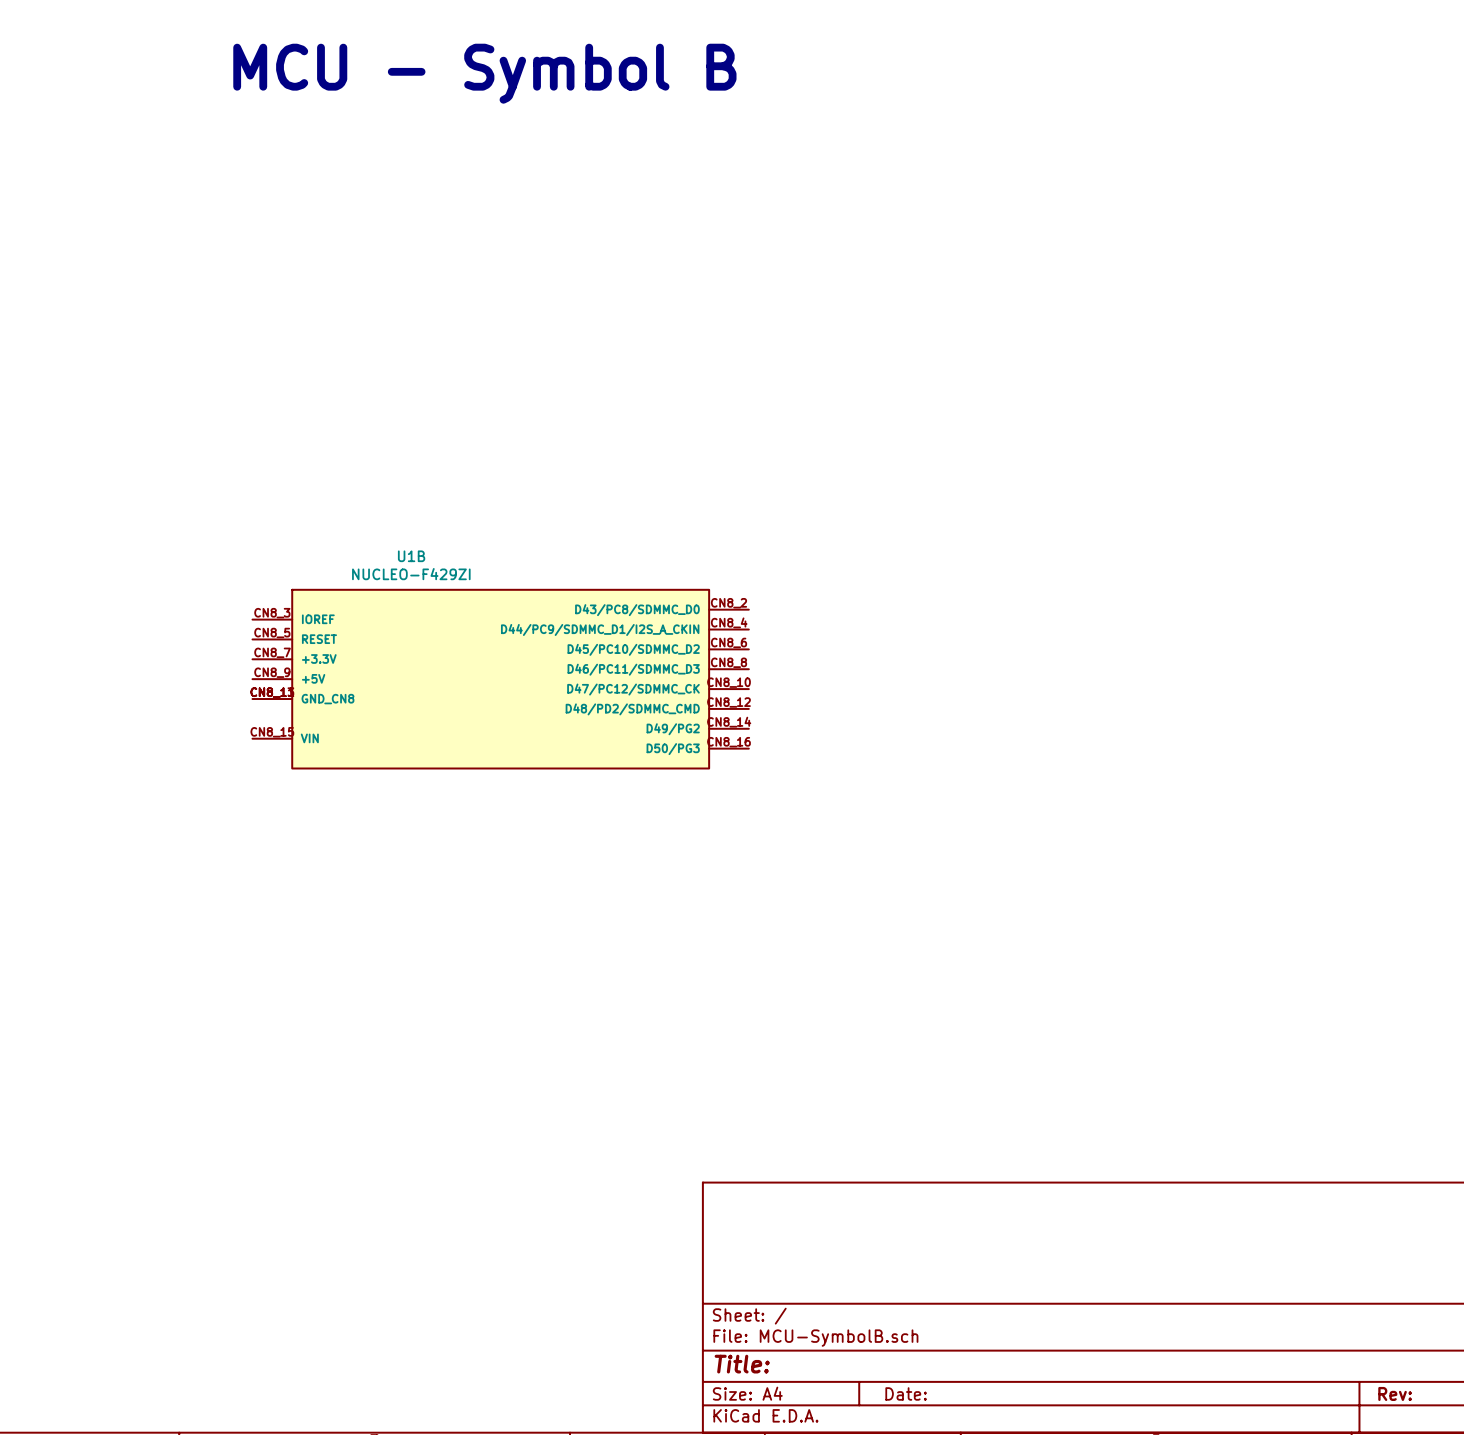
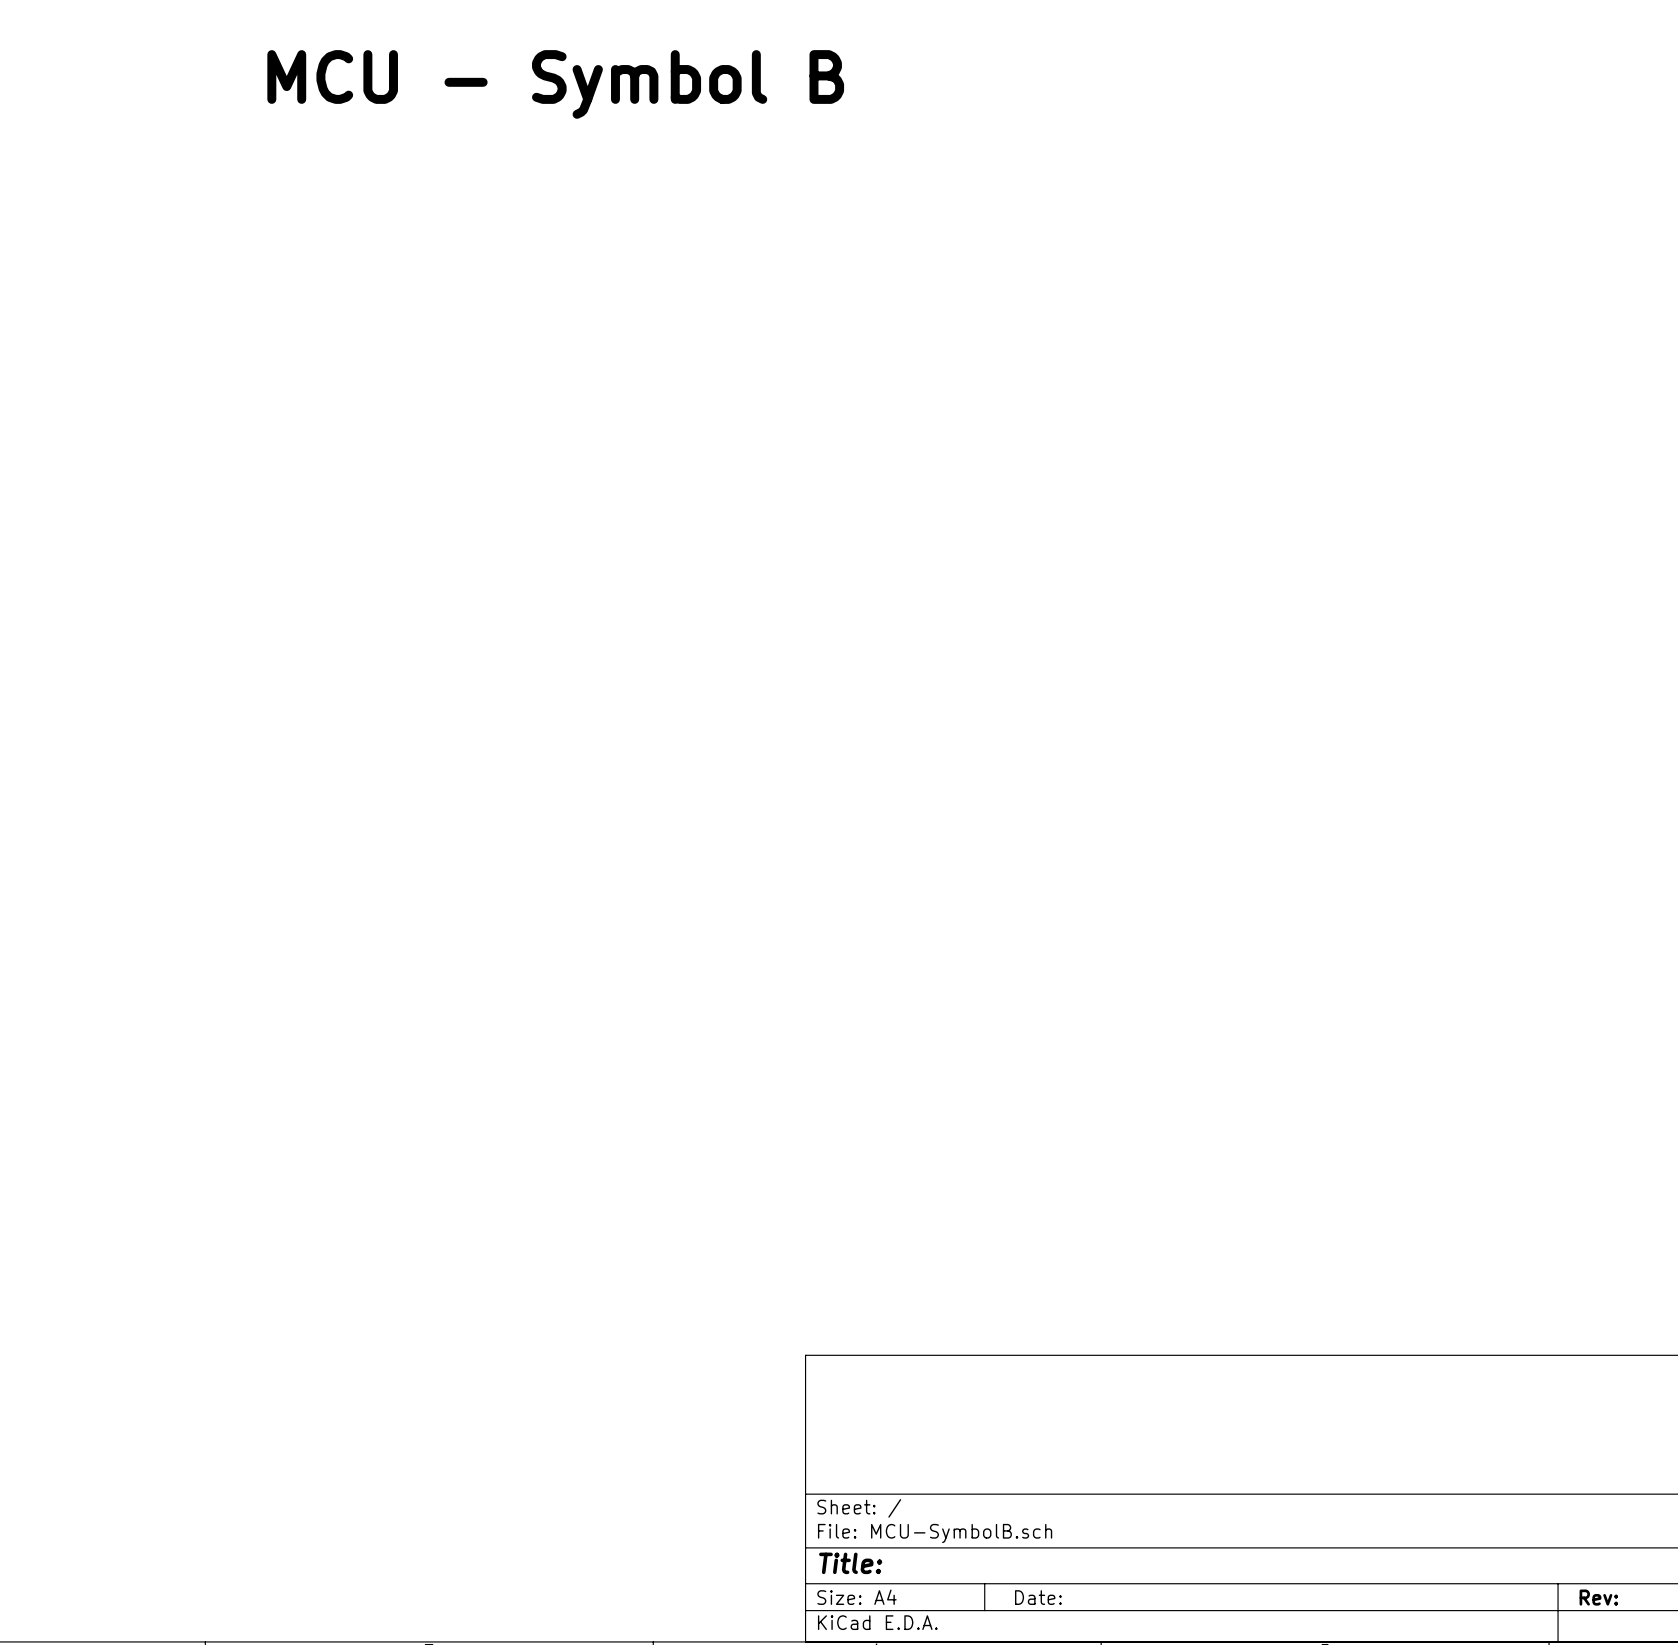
U1B: NUCLEO-F429ZI (500, 679) -> none

